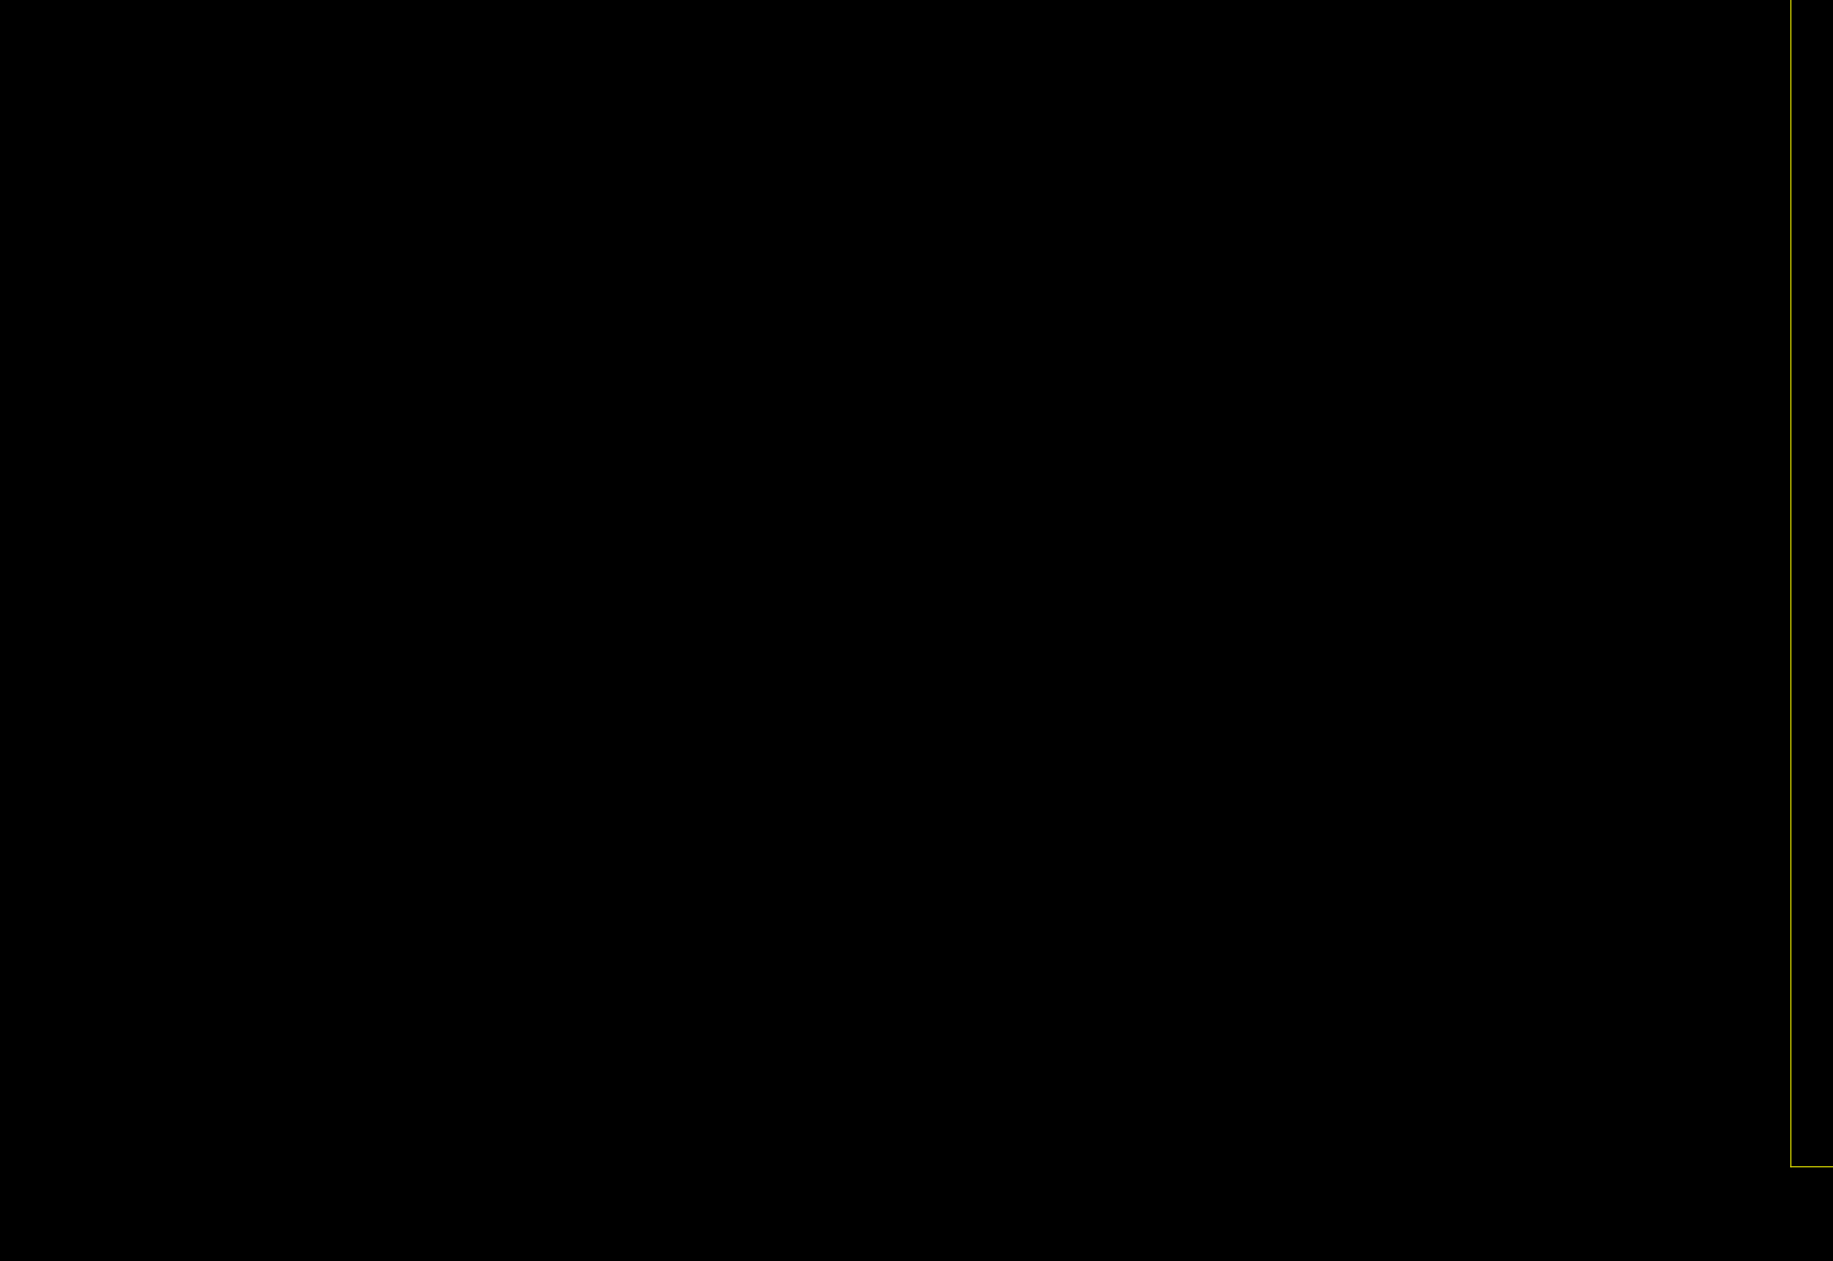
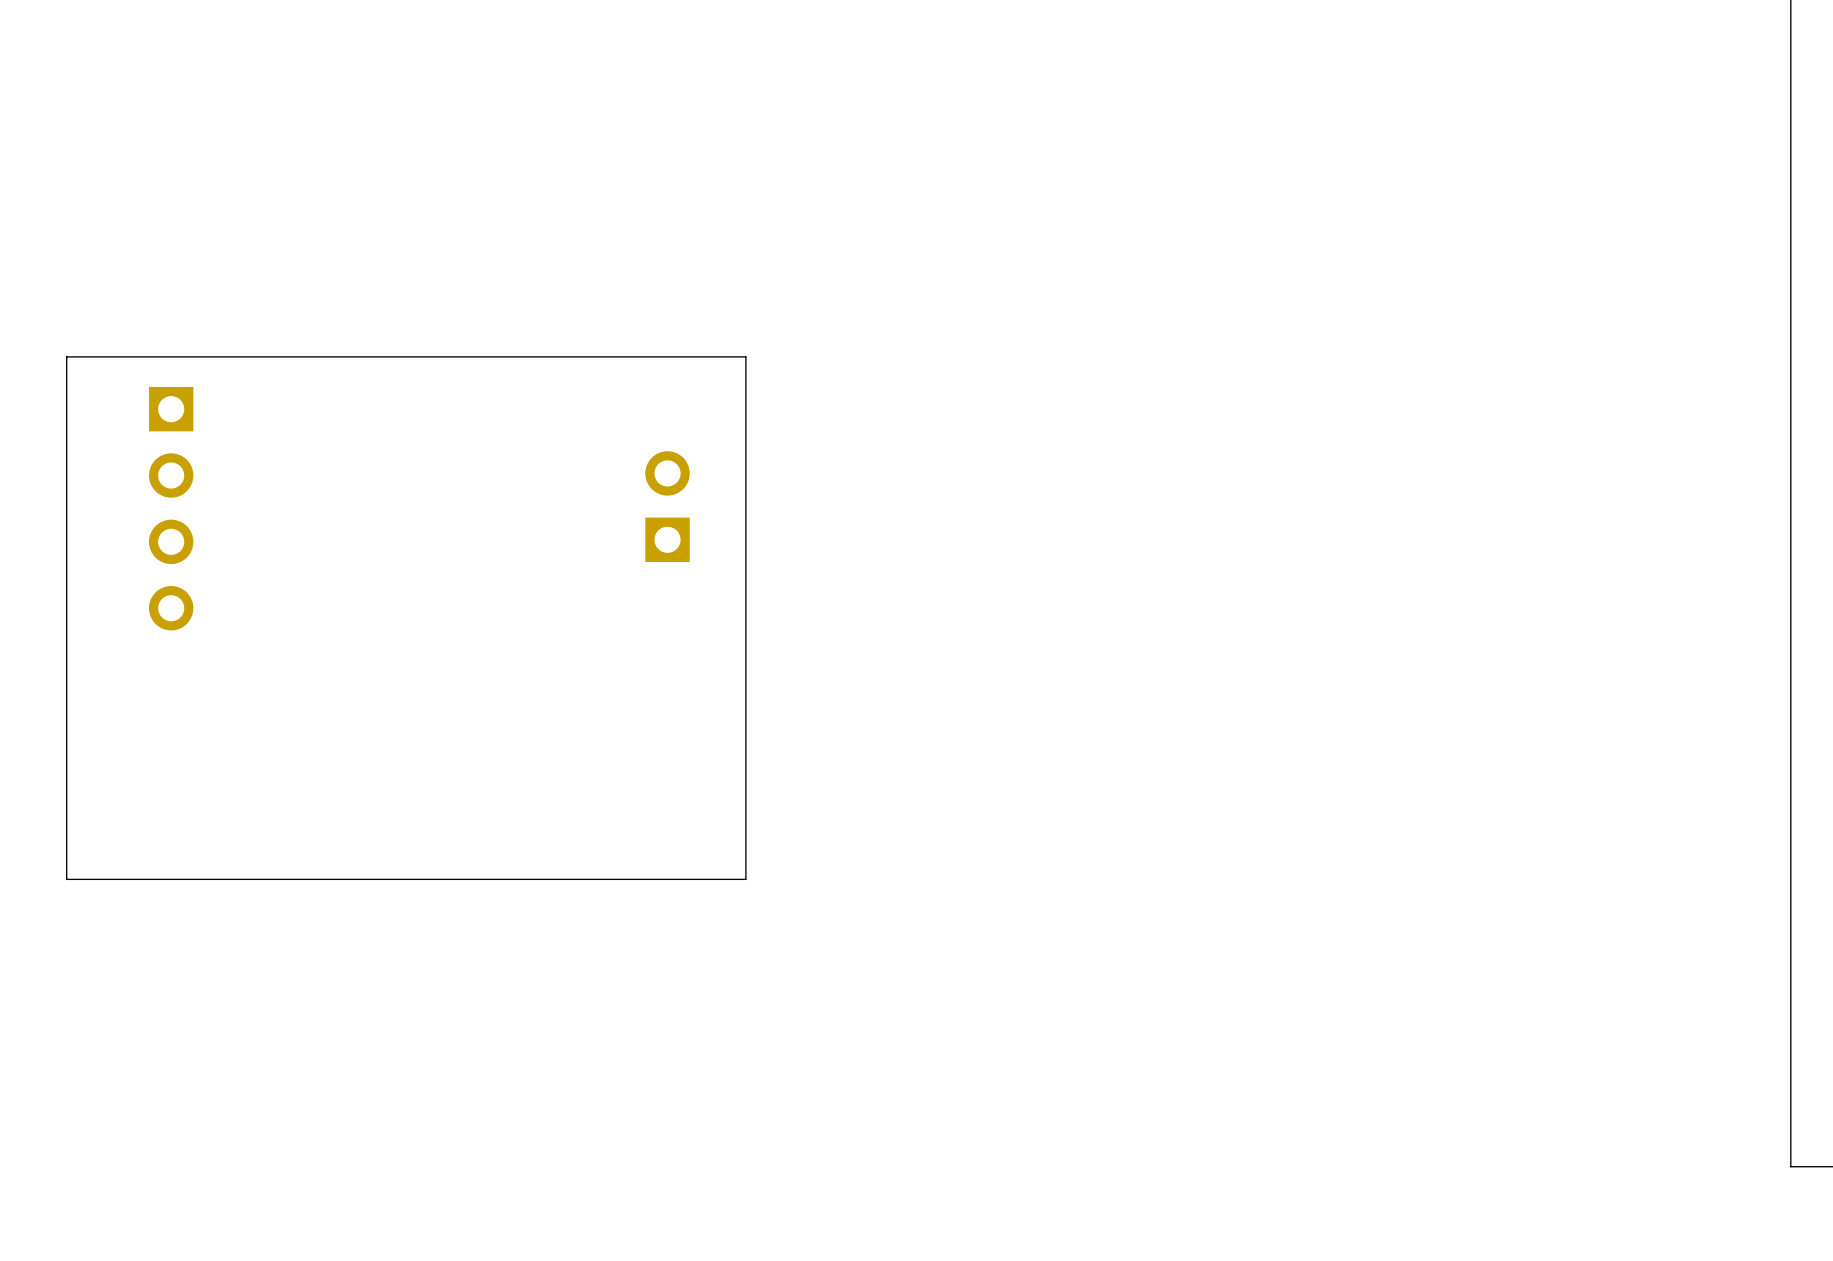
board edge: none -> (745, 356) (745, 879) (66, 879) (66, 356) (745, 356)
part: none -> (667, 506)
part: none -> (171, 508)

